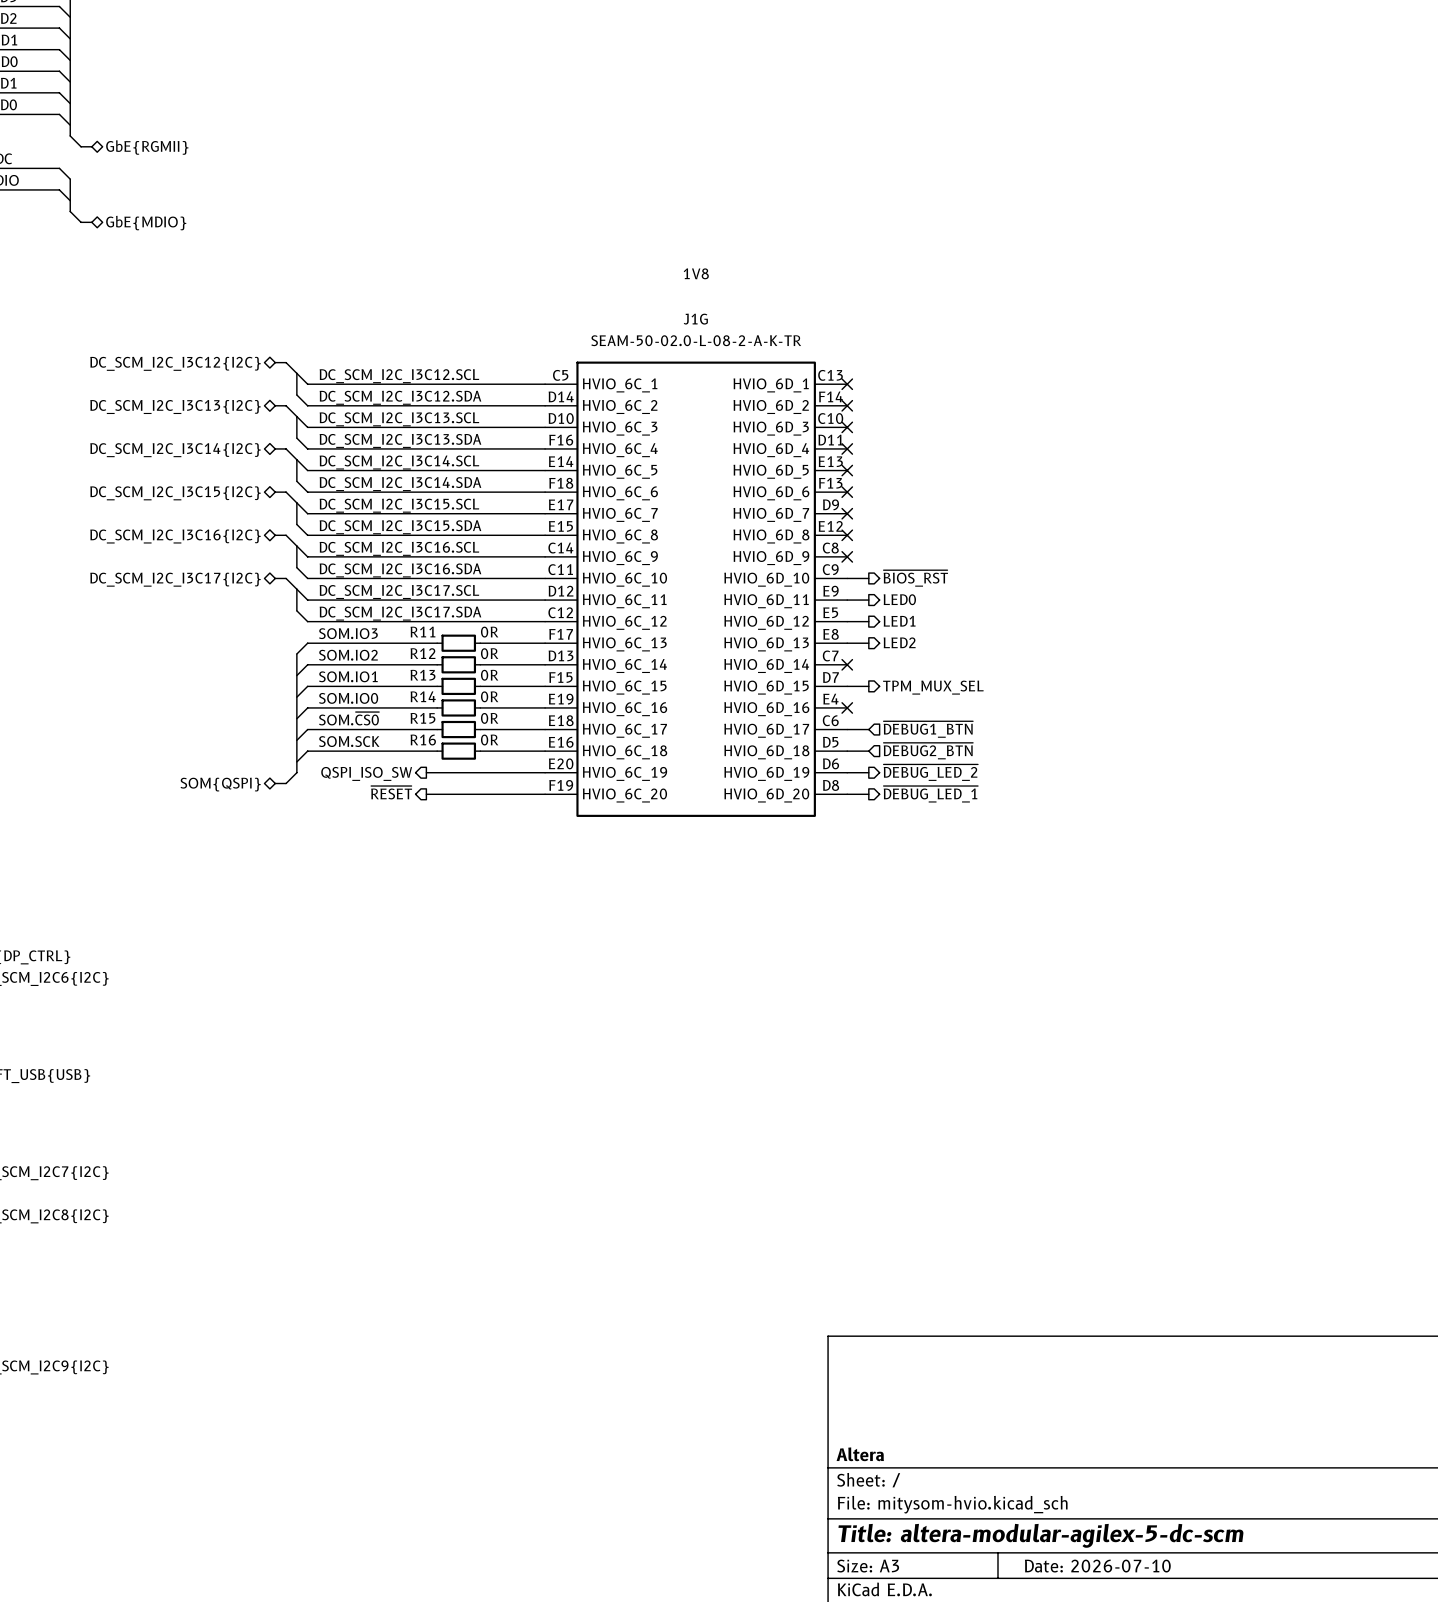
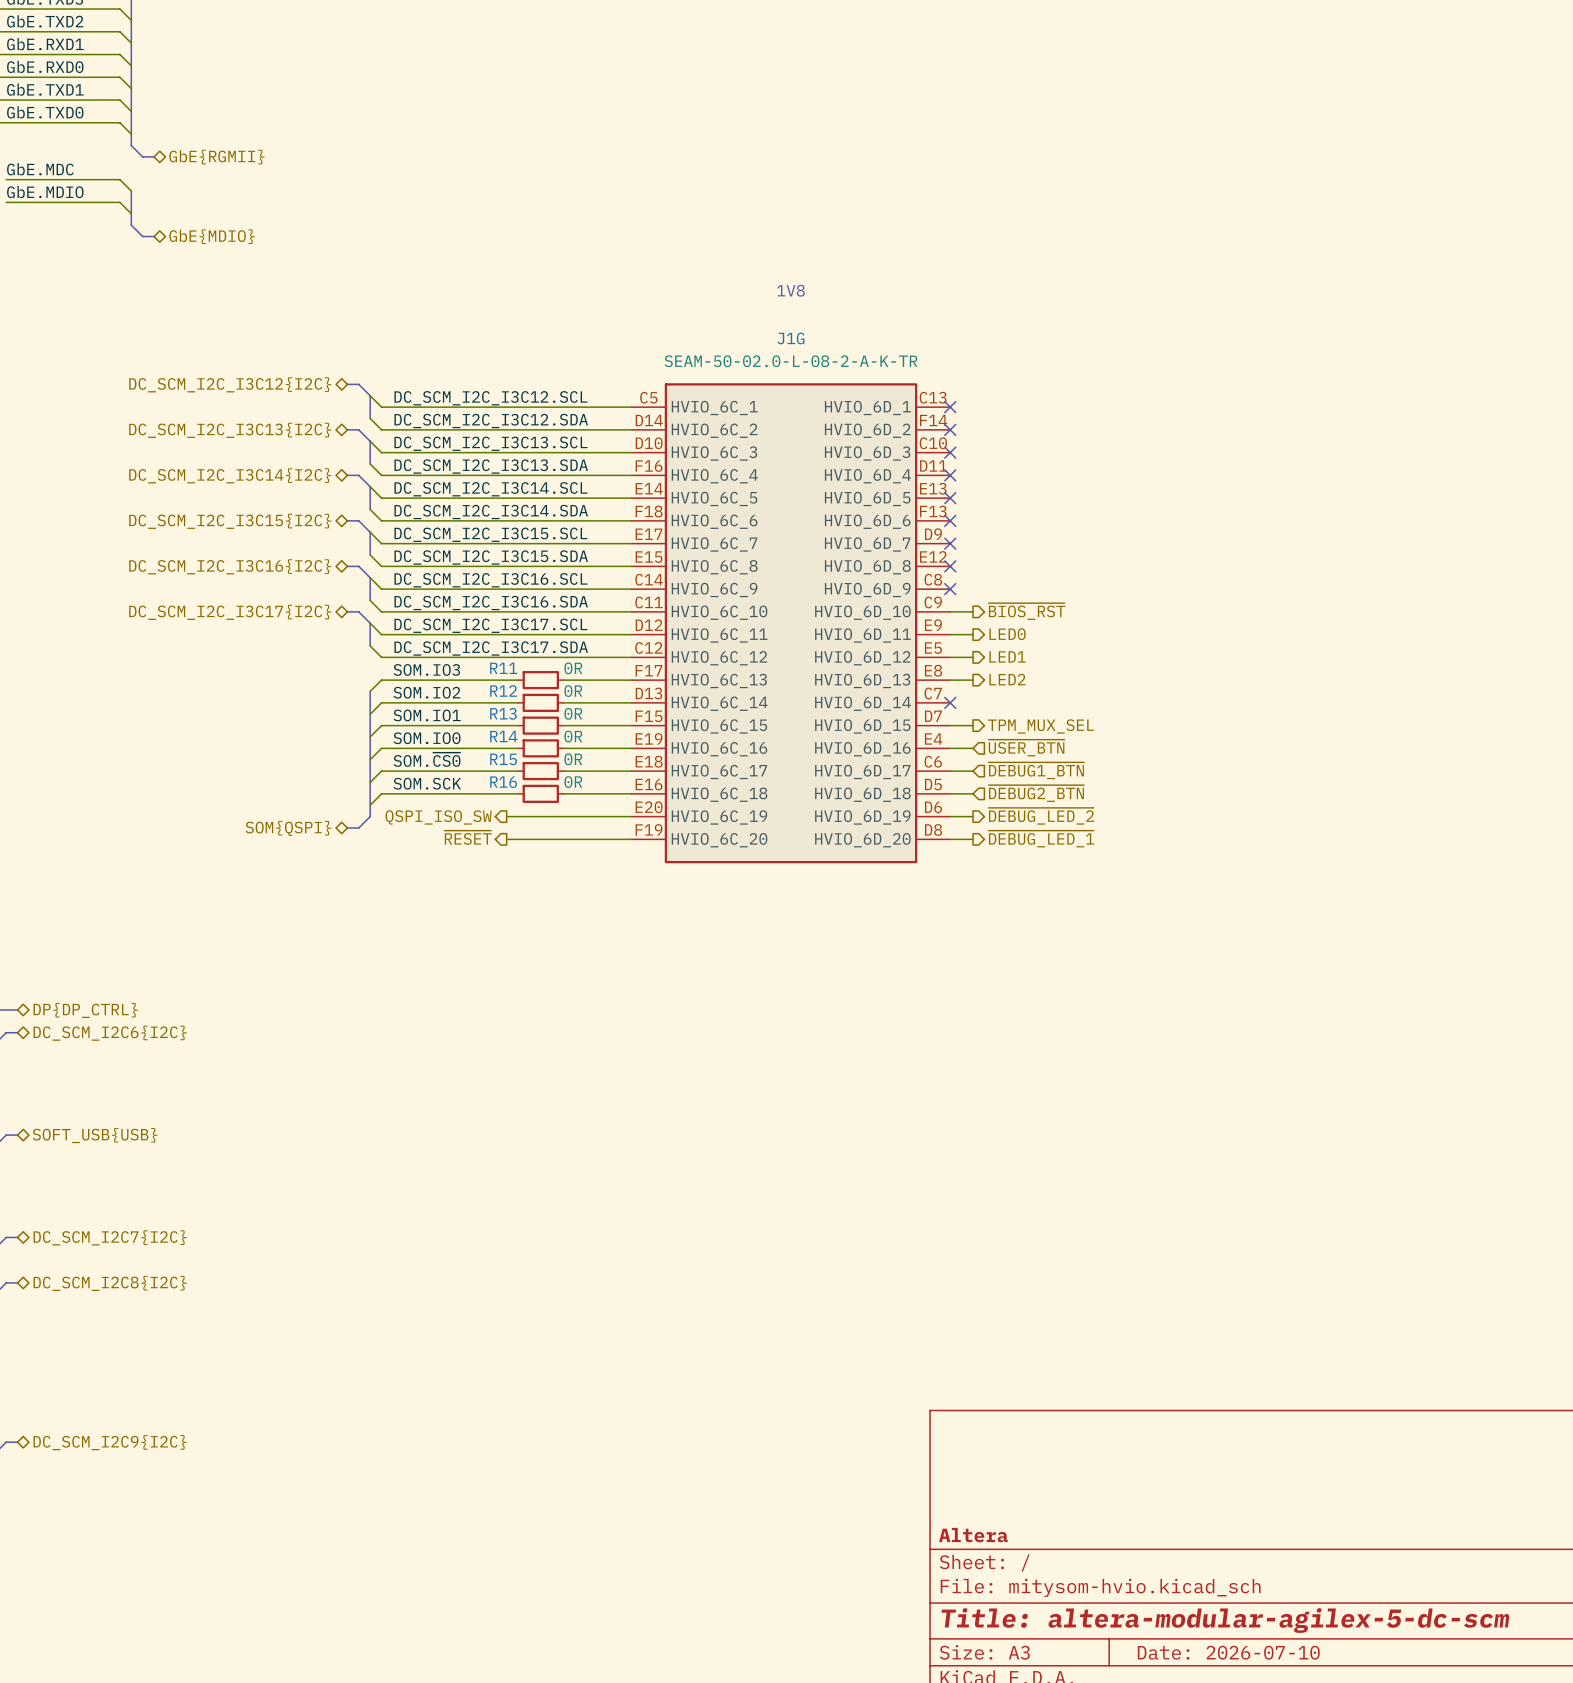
wire: none -> (950, 748) (973, 748)
no-connect mark: (847, 707) -> none
hierarchical label: none -> ~{USER_BTN} (1026, 748)

